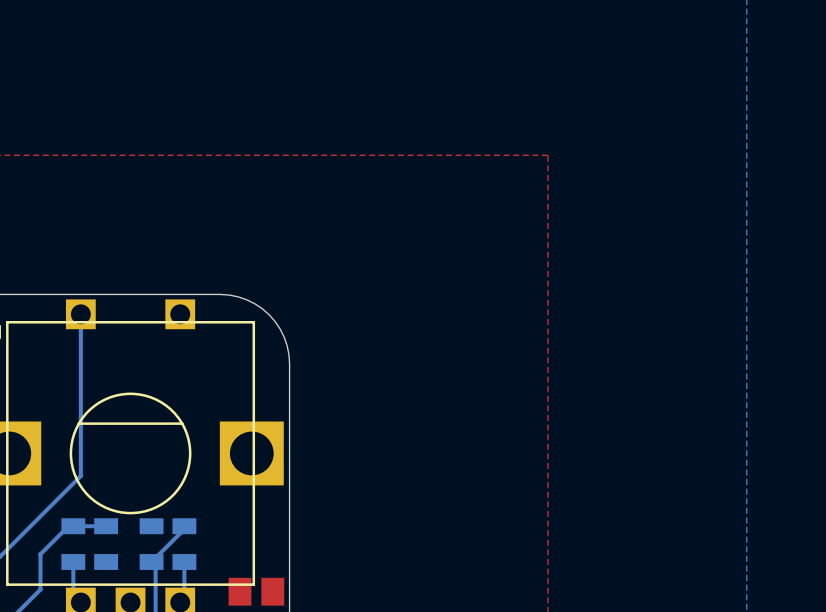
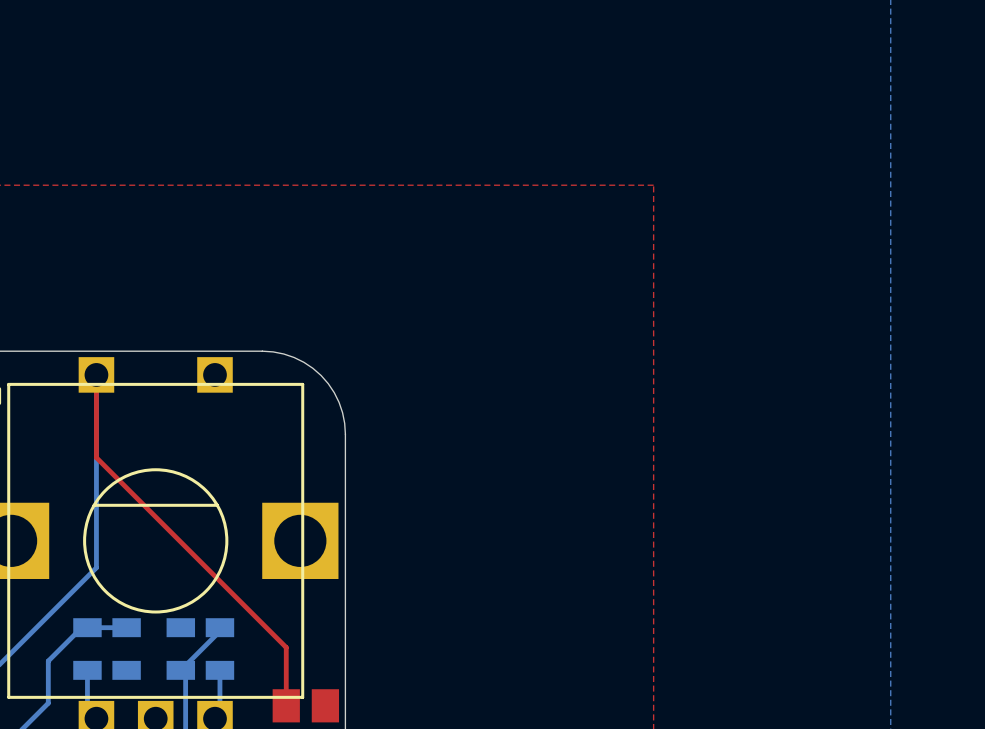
top track: none -> (96, 374) (96, 457) (286, 647) (286, 705)

